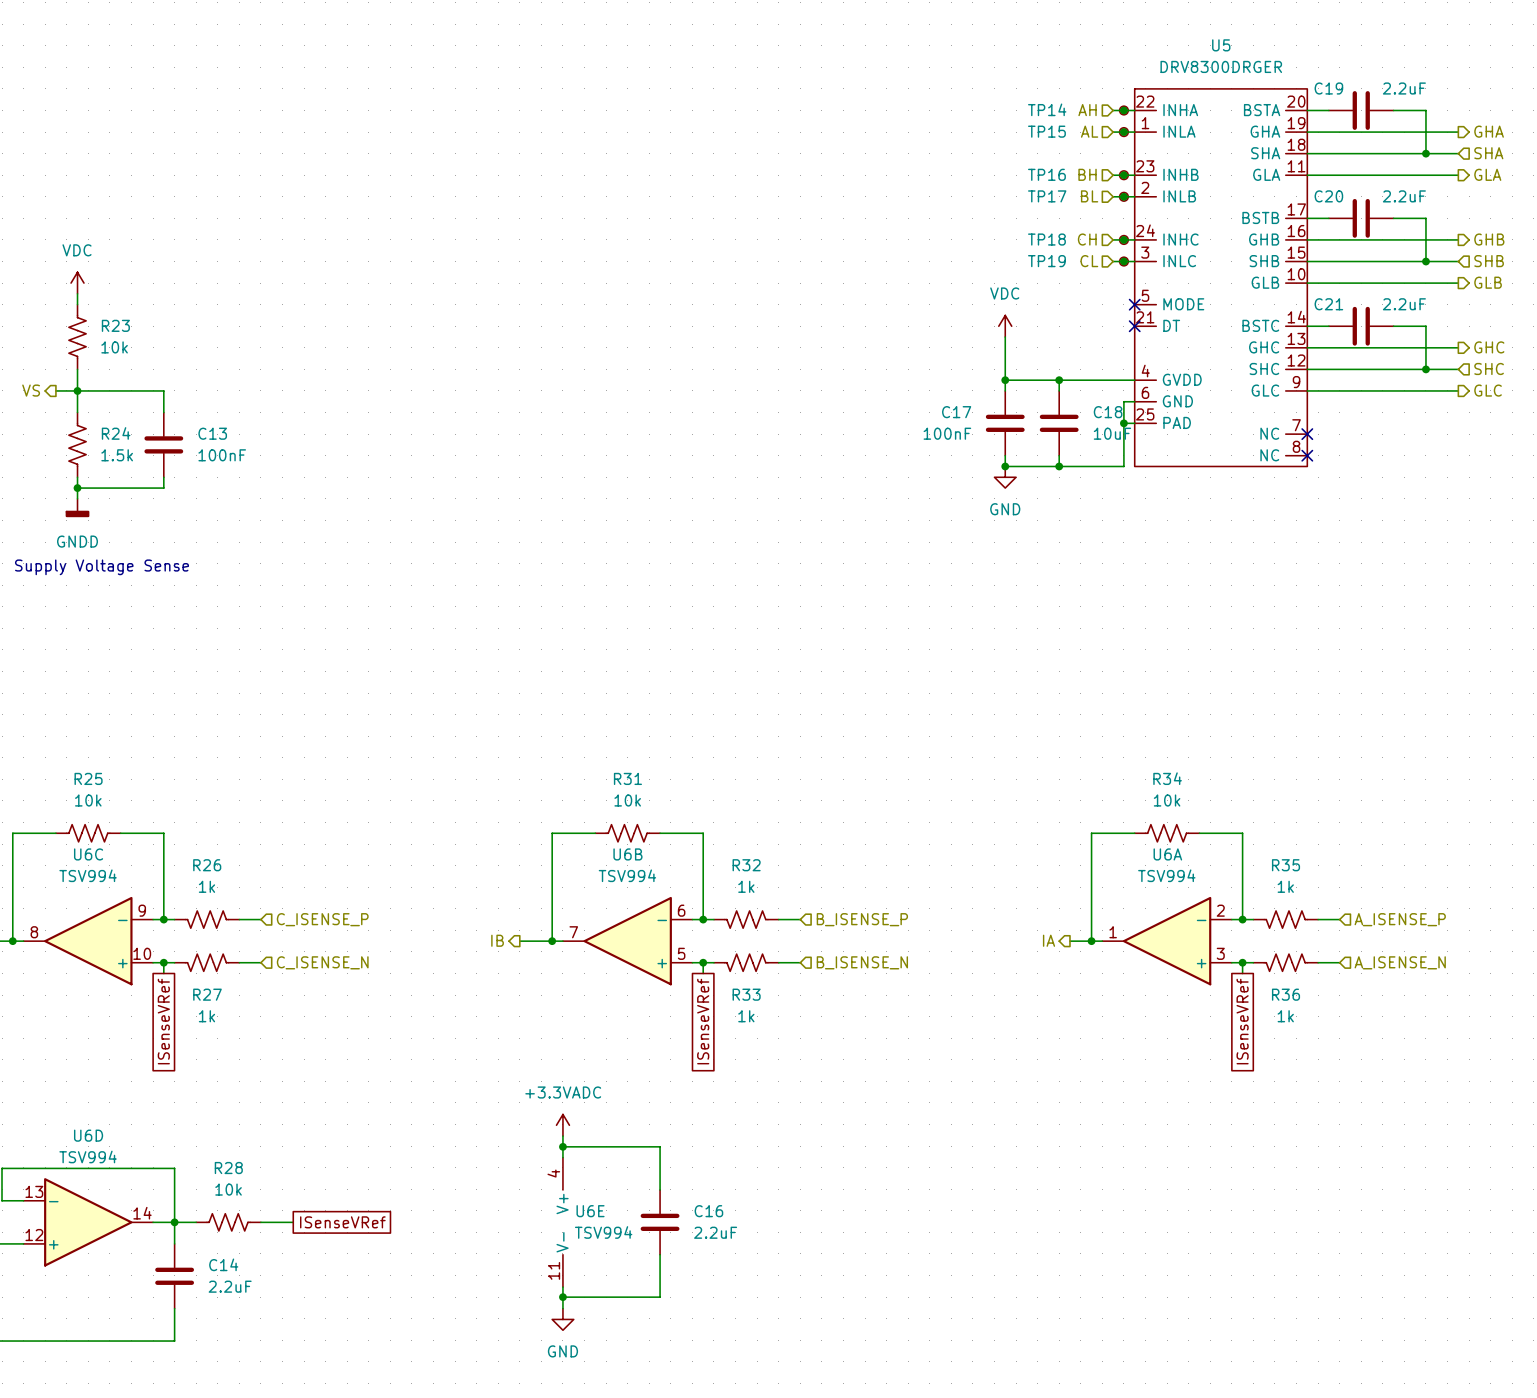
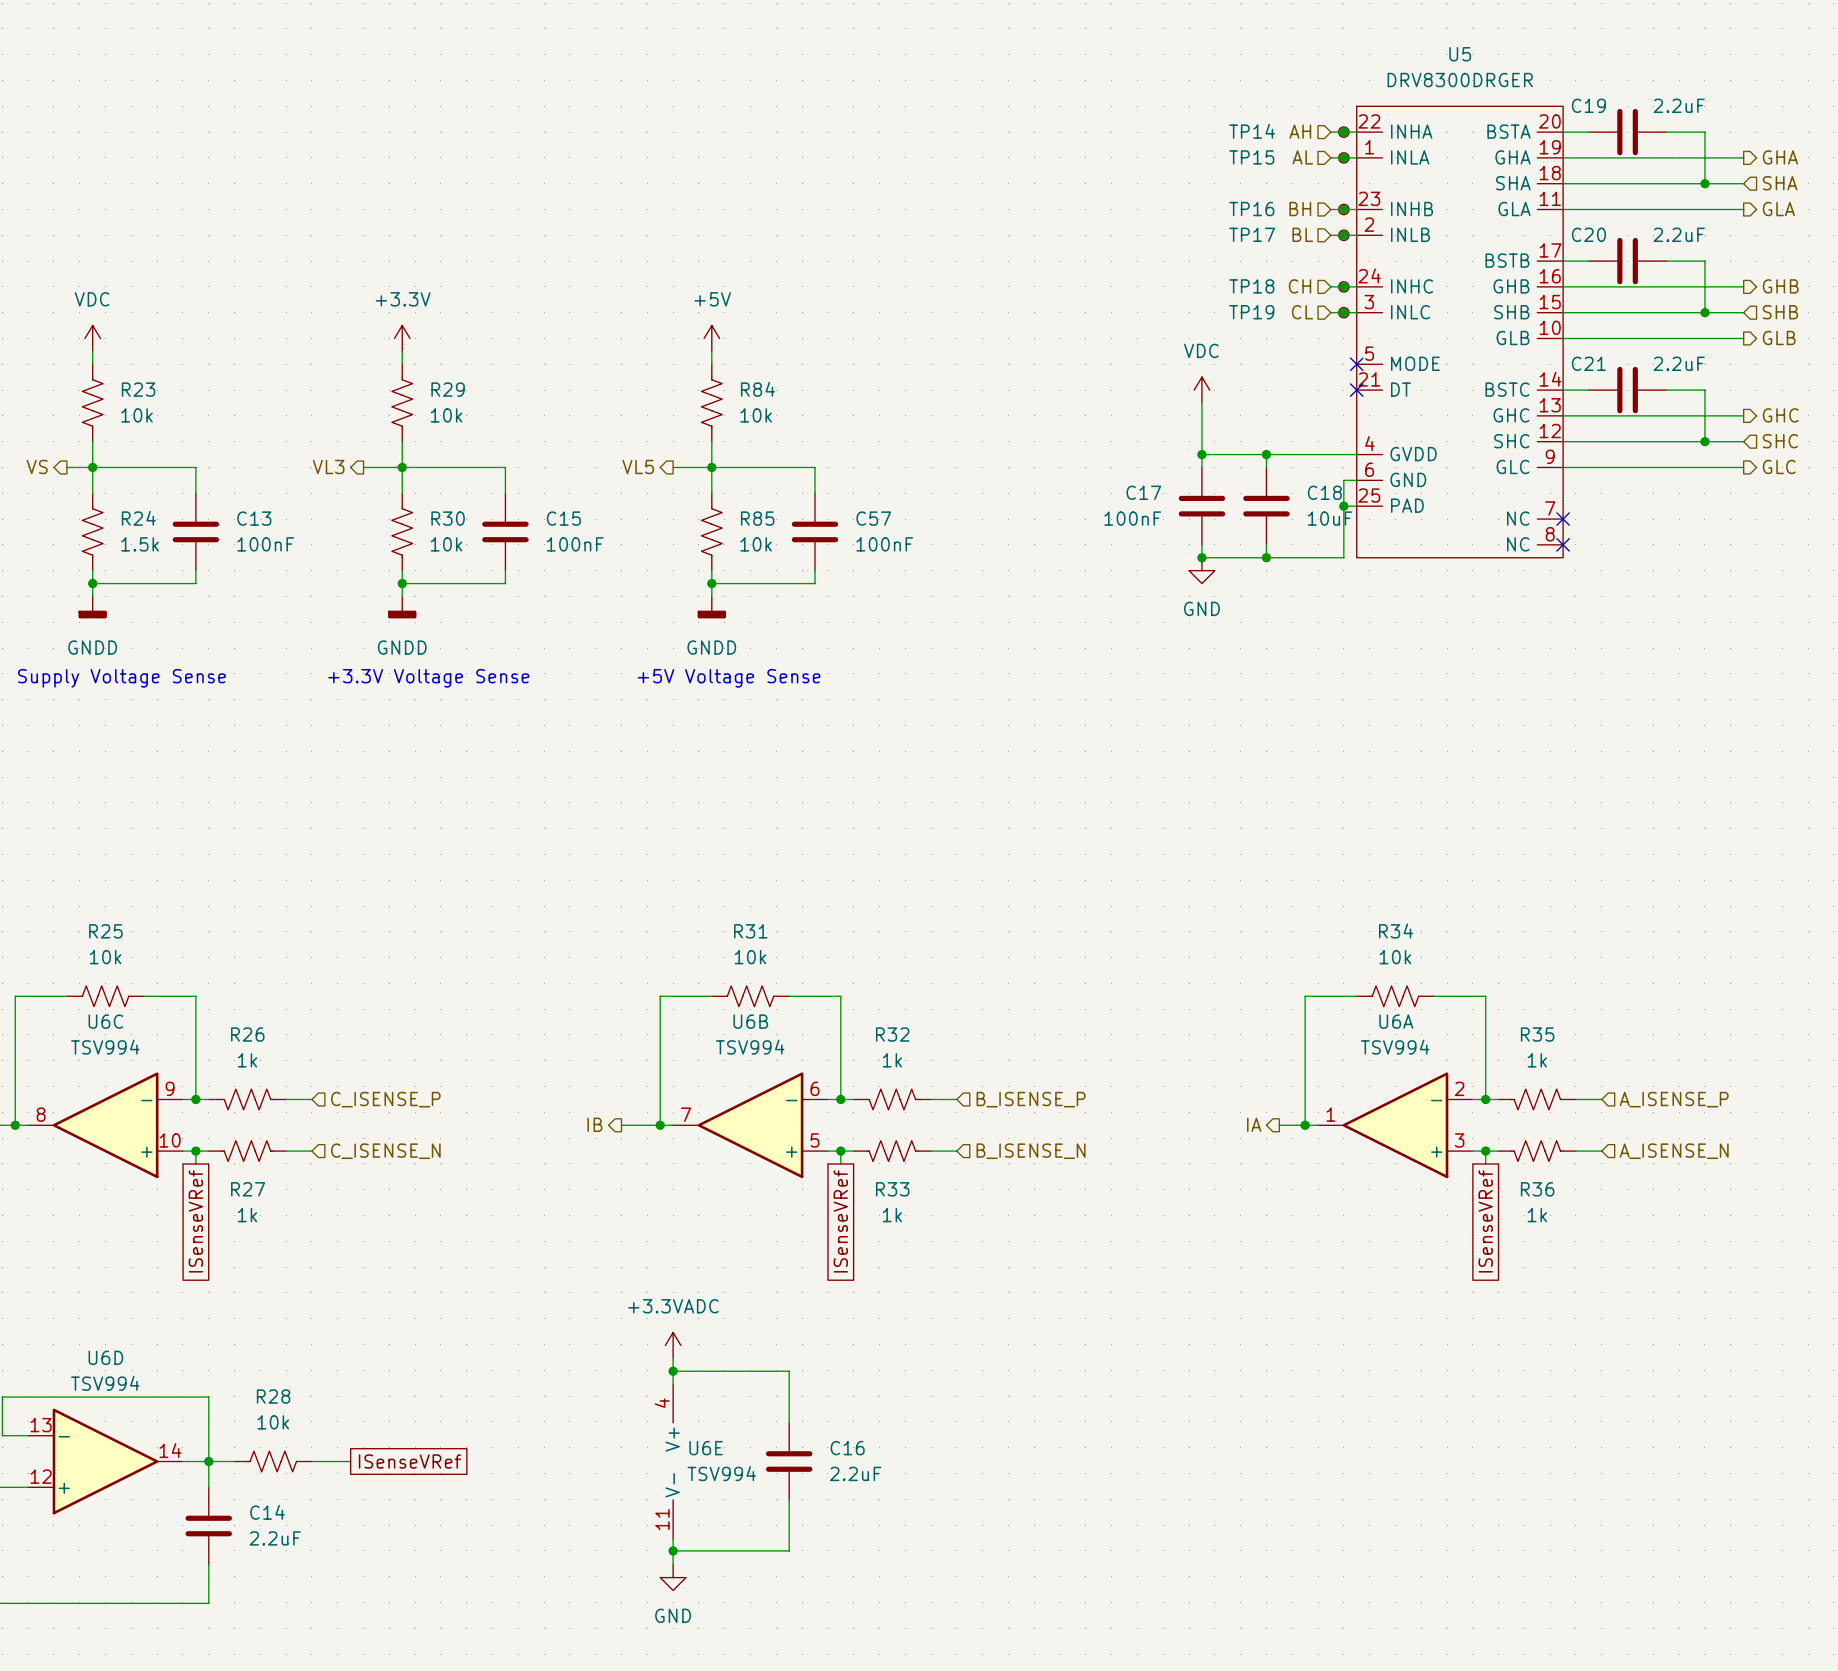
power symbol: none -> +3.3V (402, 338)
power symbol: none -> +5V (711, 338)
wire: none -> (402, 351) (402, 364)
wire: none -> (711, 351) (711, 364)
R29: none -> 10k (402, 402)
R84: none -> 10k (711, 402)
wire: none -> (402, 441) (402, 493)
wire: none -> (711, 441) (711, 493)
hierarchical label: none -> VL3 (328, 466)
wire: none -> (363, 467) (505, 467) (505, 493)
junction: none -> (402, 467)
hierarchical label: none -> VL5 (638, 466)
wire: none -> (673, 467) (814, 467) (814, 493)
junction: none -> (711, 467)
R30: none -> 10k (402, 531)
C15: none -> 100nF (505, 531)
R85: none -> 10k (711, 531)
C57: none -> 100nF (814, 531)
wire: none -> (402, 570) (402, 596)
wire: none -> (505, 570) (505, 583) (402, 583)
wire: none -> (711, 570) (711, 596)
wire: none -> (814, 570) (814, 583) (711, 583)
junction: none -> (402, 583)
junction: none -> (711, 583)
power symbol: none -> GNDD (402, 607)
power symbol: none -> GNDD (711, 607)
text: none -> +3.3V Voltage Sense (428, 678)
text: none -> +5V Voltage Sense (729, 678)

